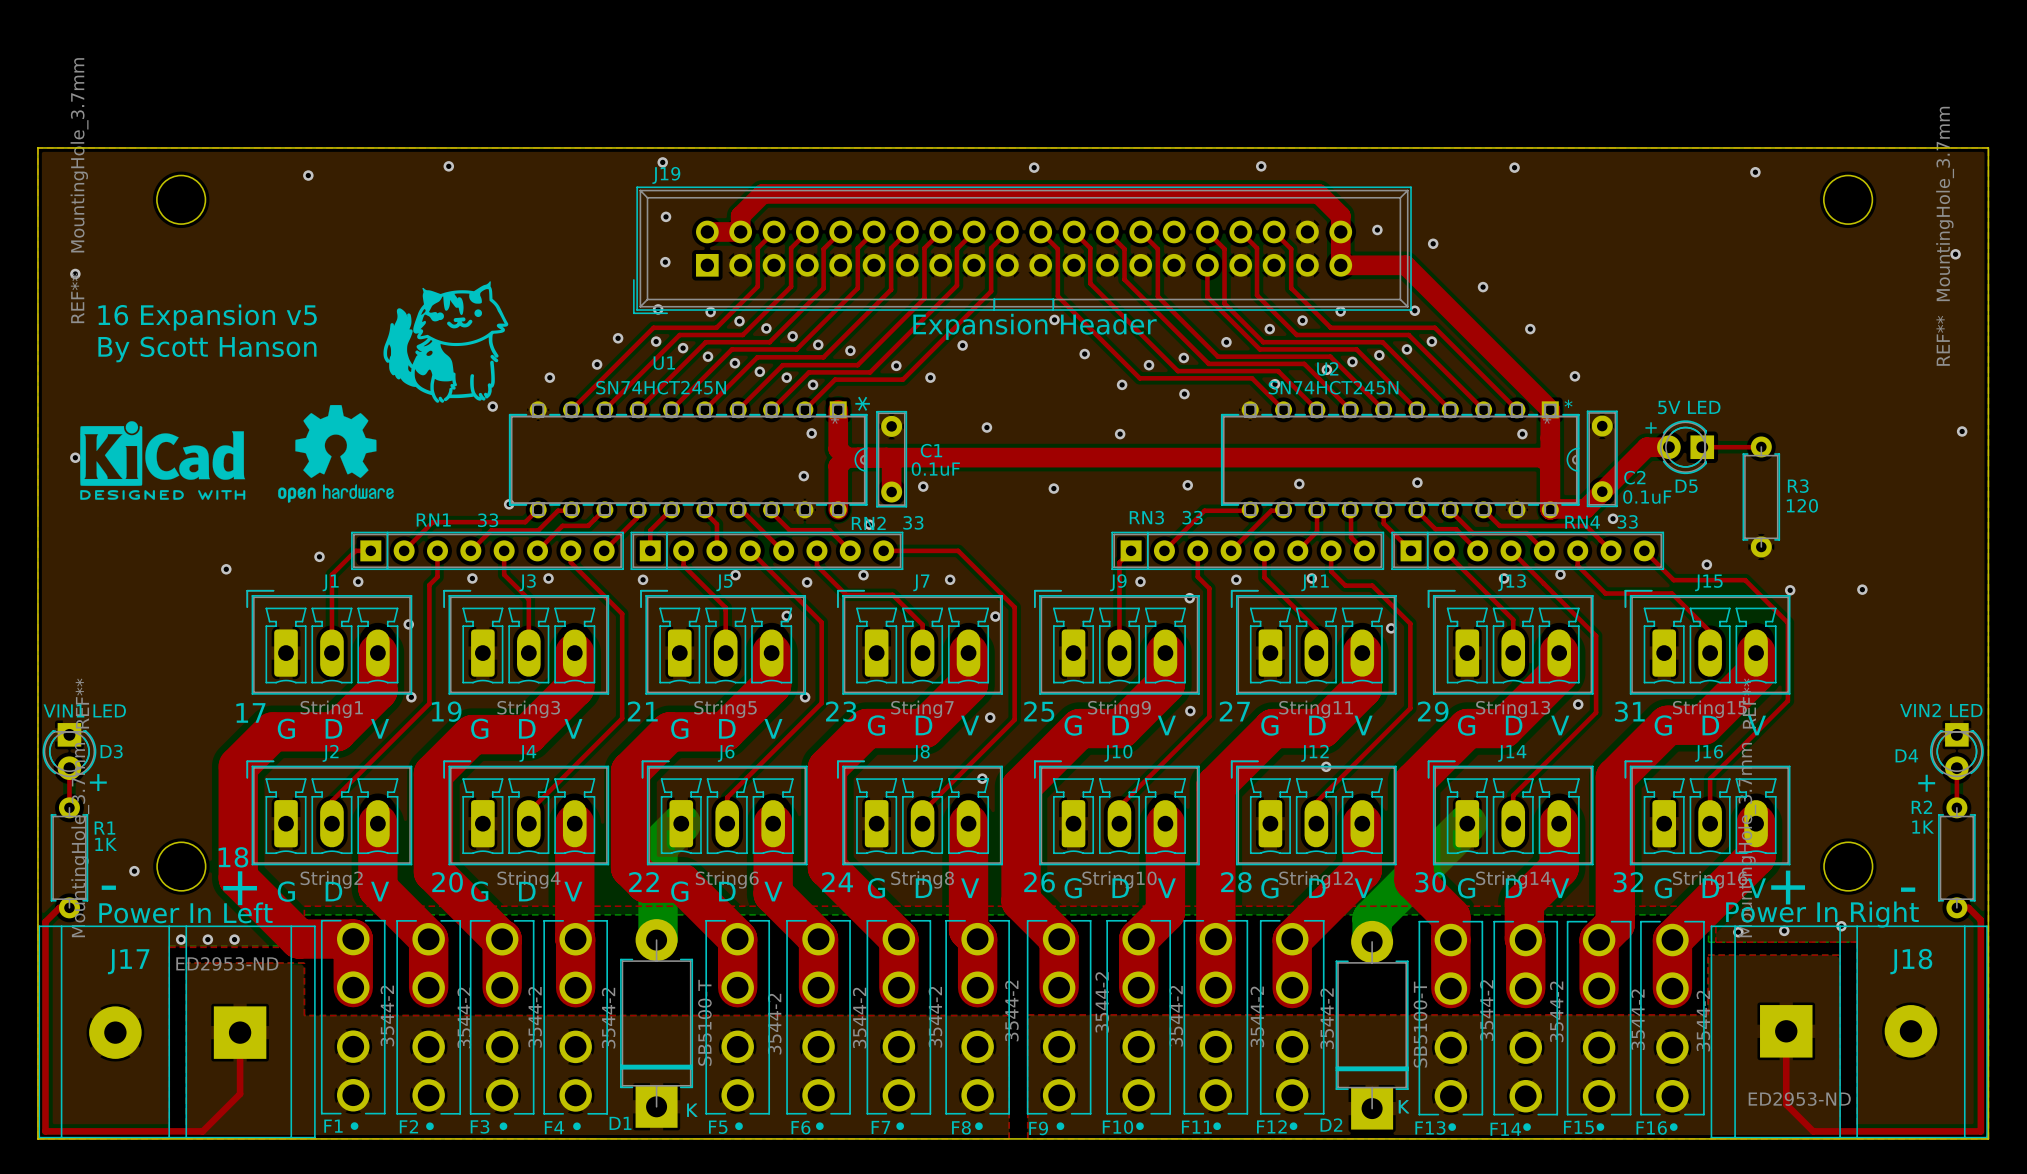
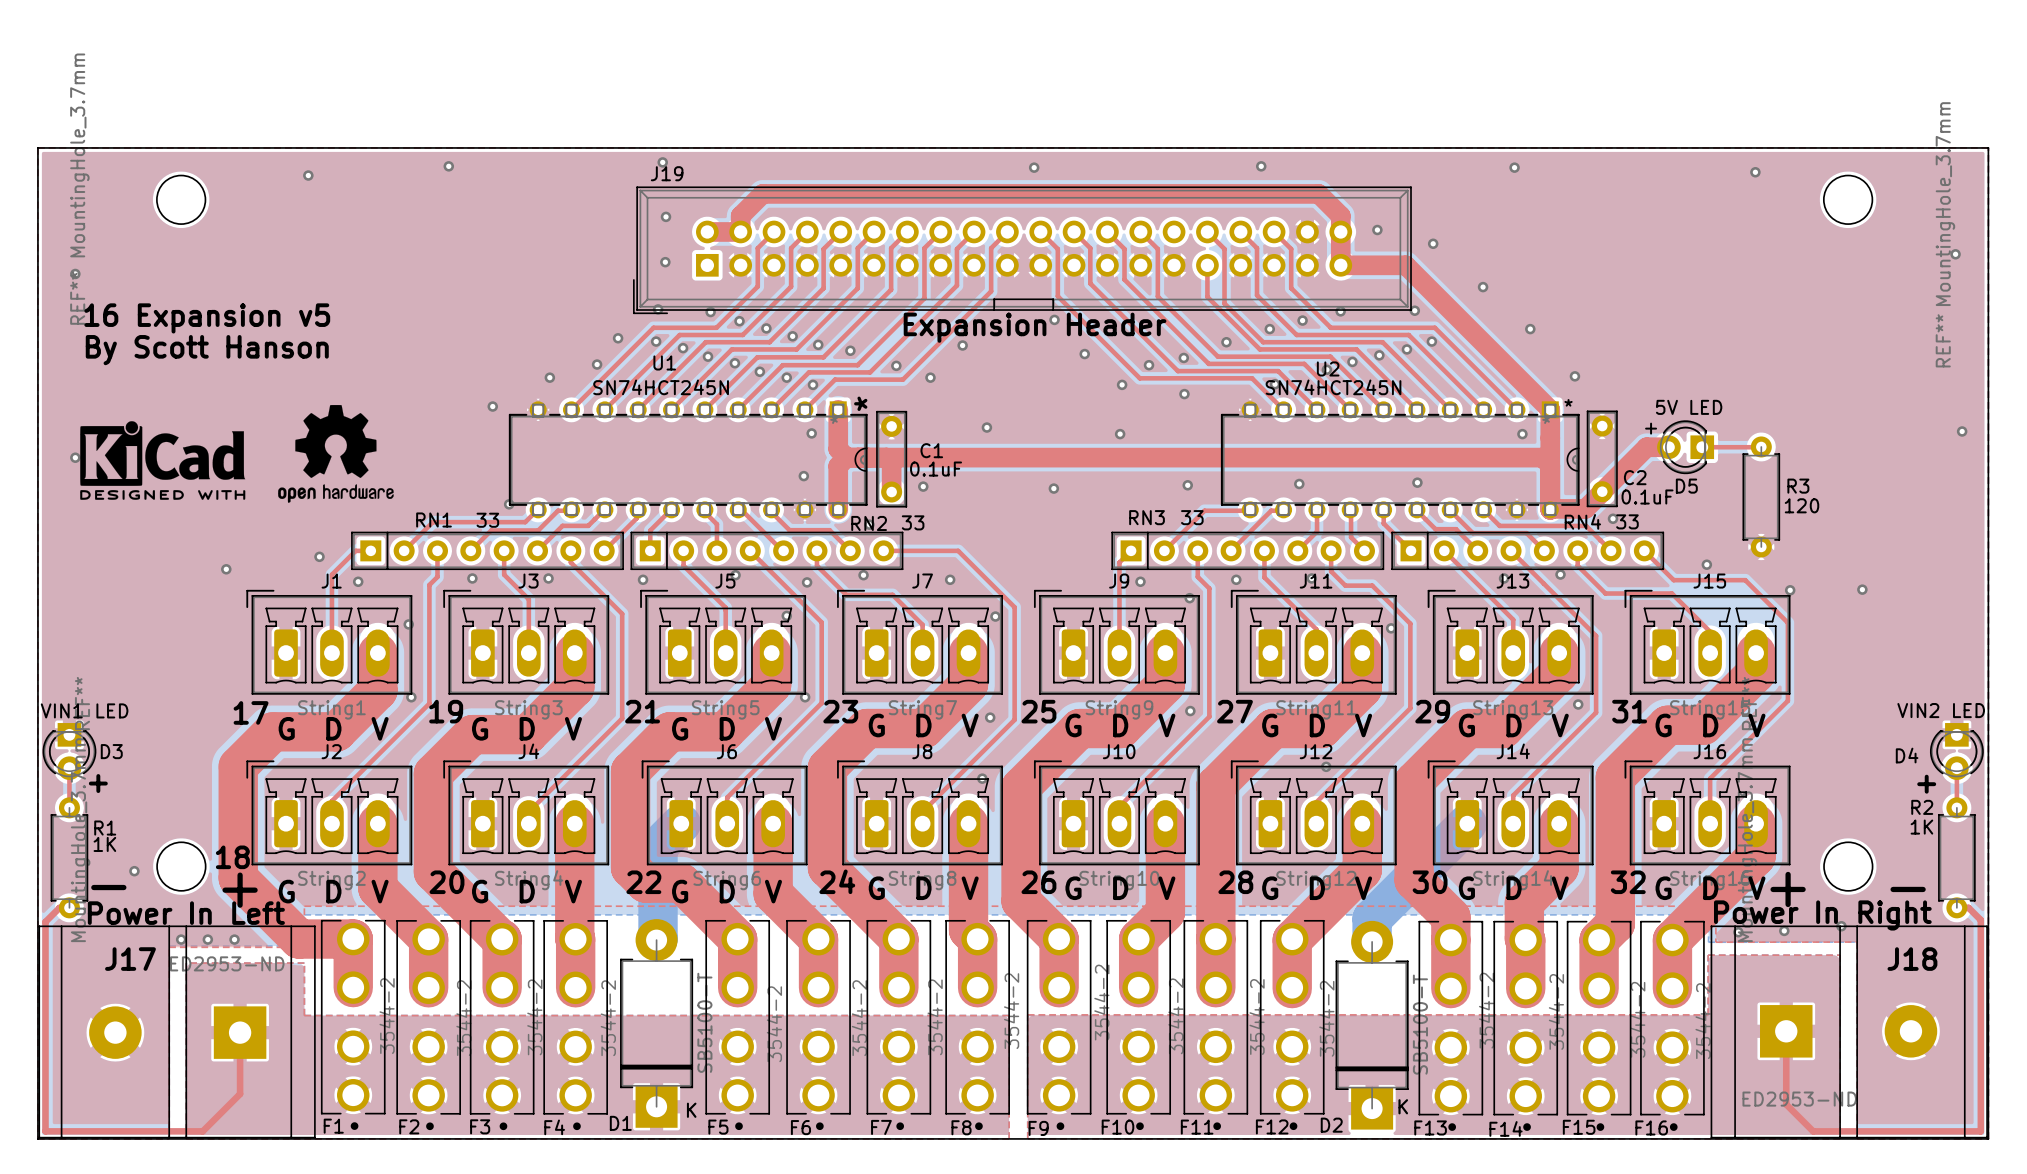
drawing: [383, 281, 509, 403] -> none

